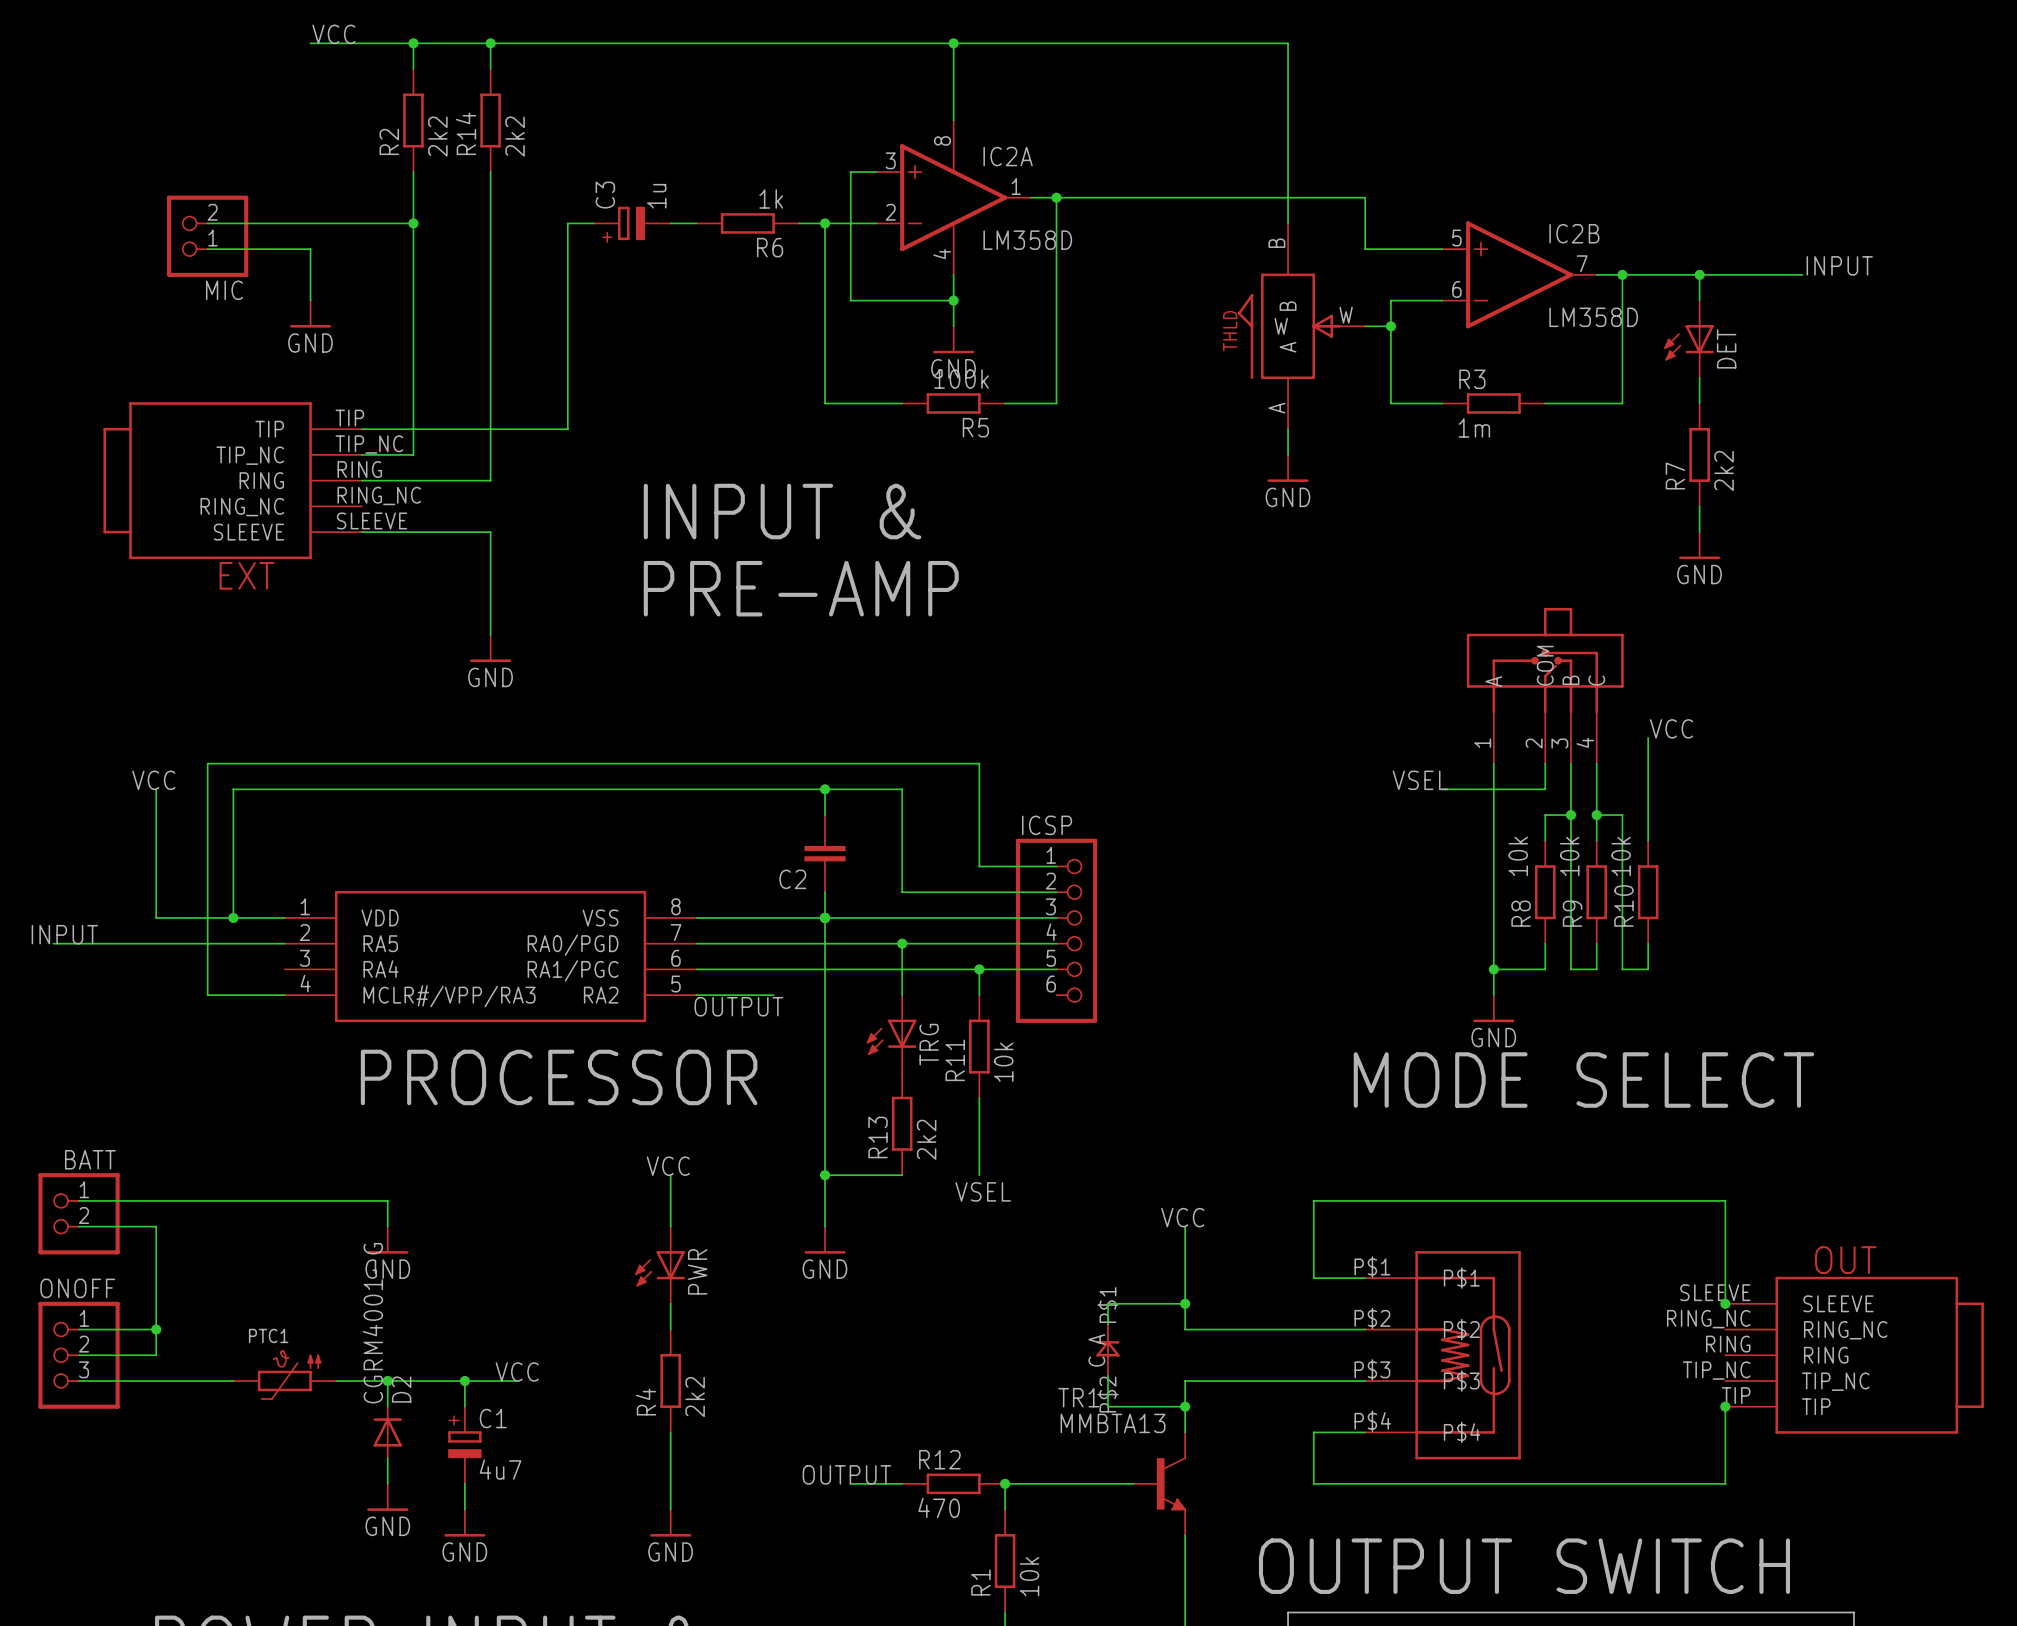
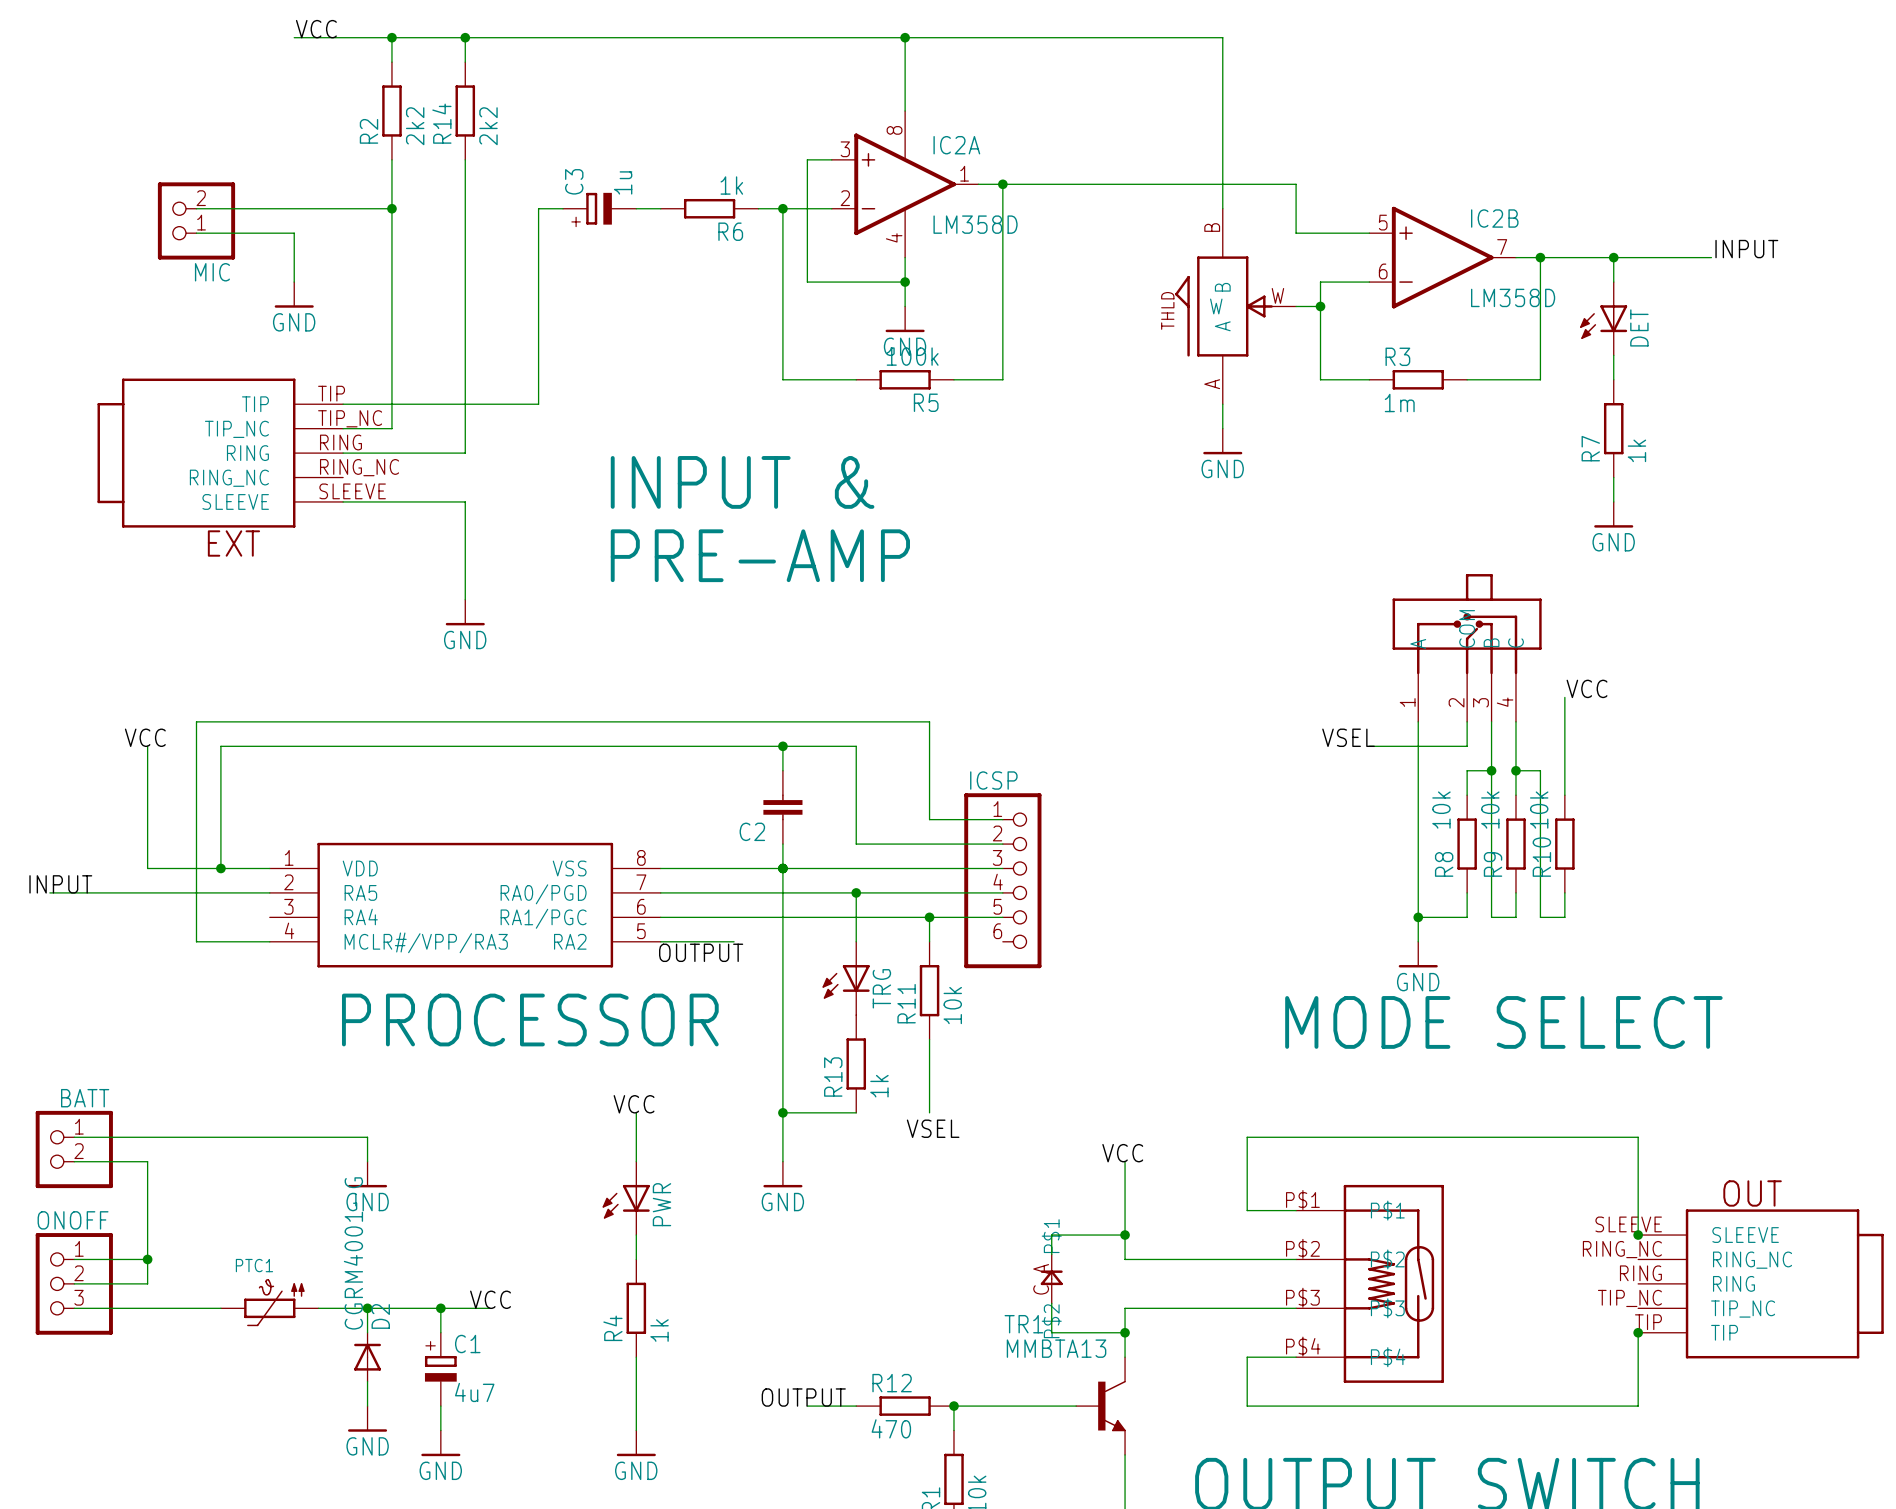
R7 value: 2k2 (1724, 470) -> 1k (1636, 450)
R13 value: 2k2 (926, 1139) -> 1k (879, 1086)
R4 value: 2k2 (695, 1397) -> 1k (659, 1330)

